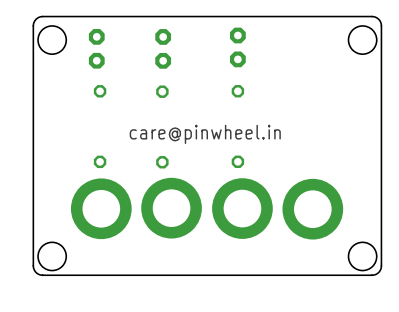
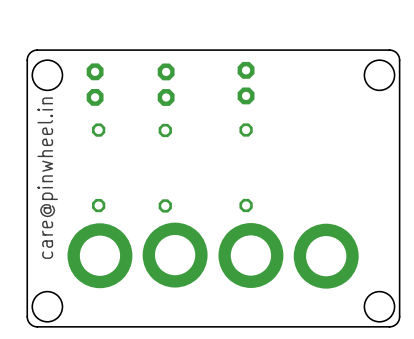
text rotation: 0° (205, 134) -> 90° counterclockwise (47, 178)

